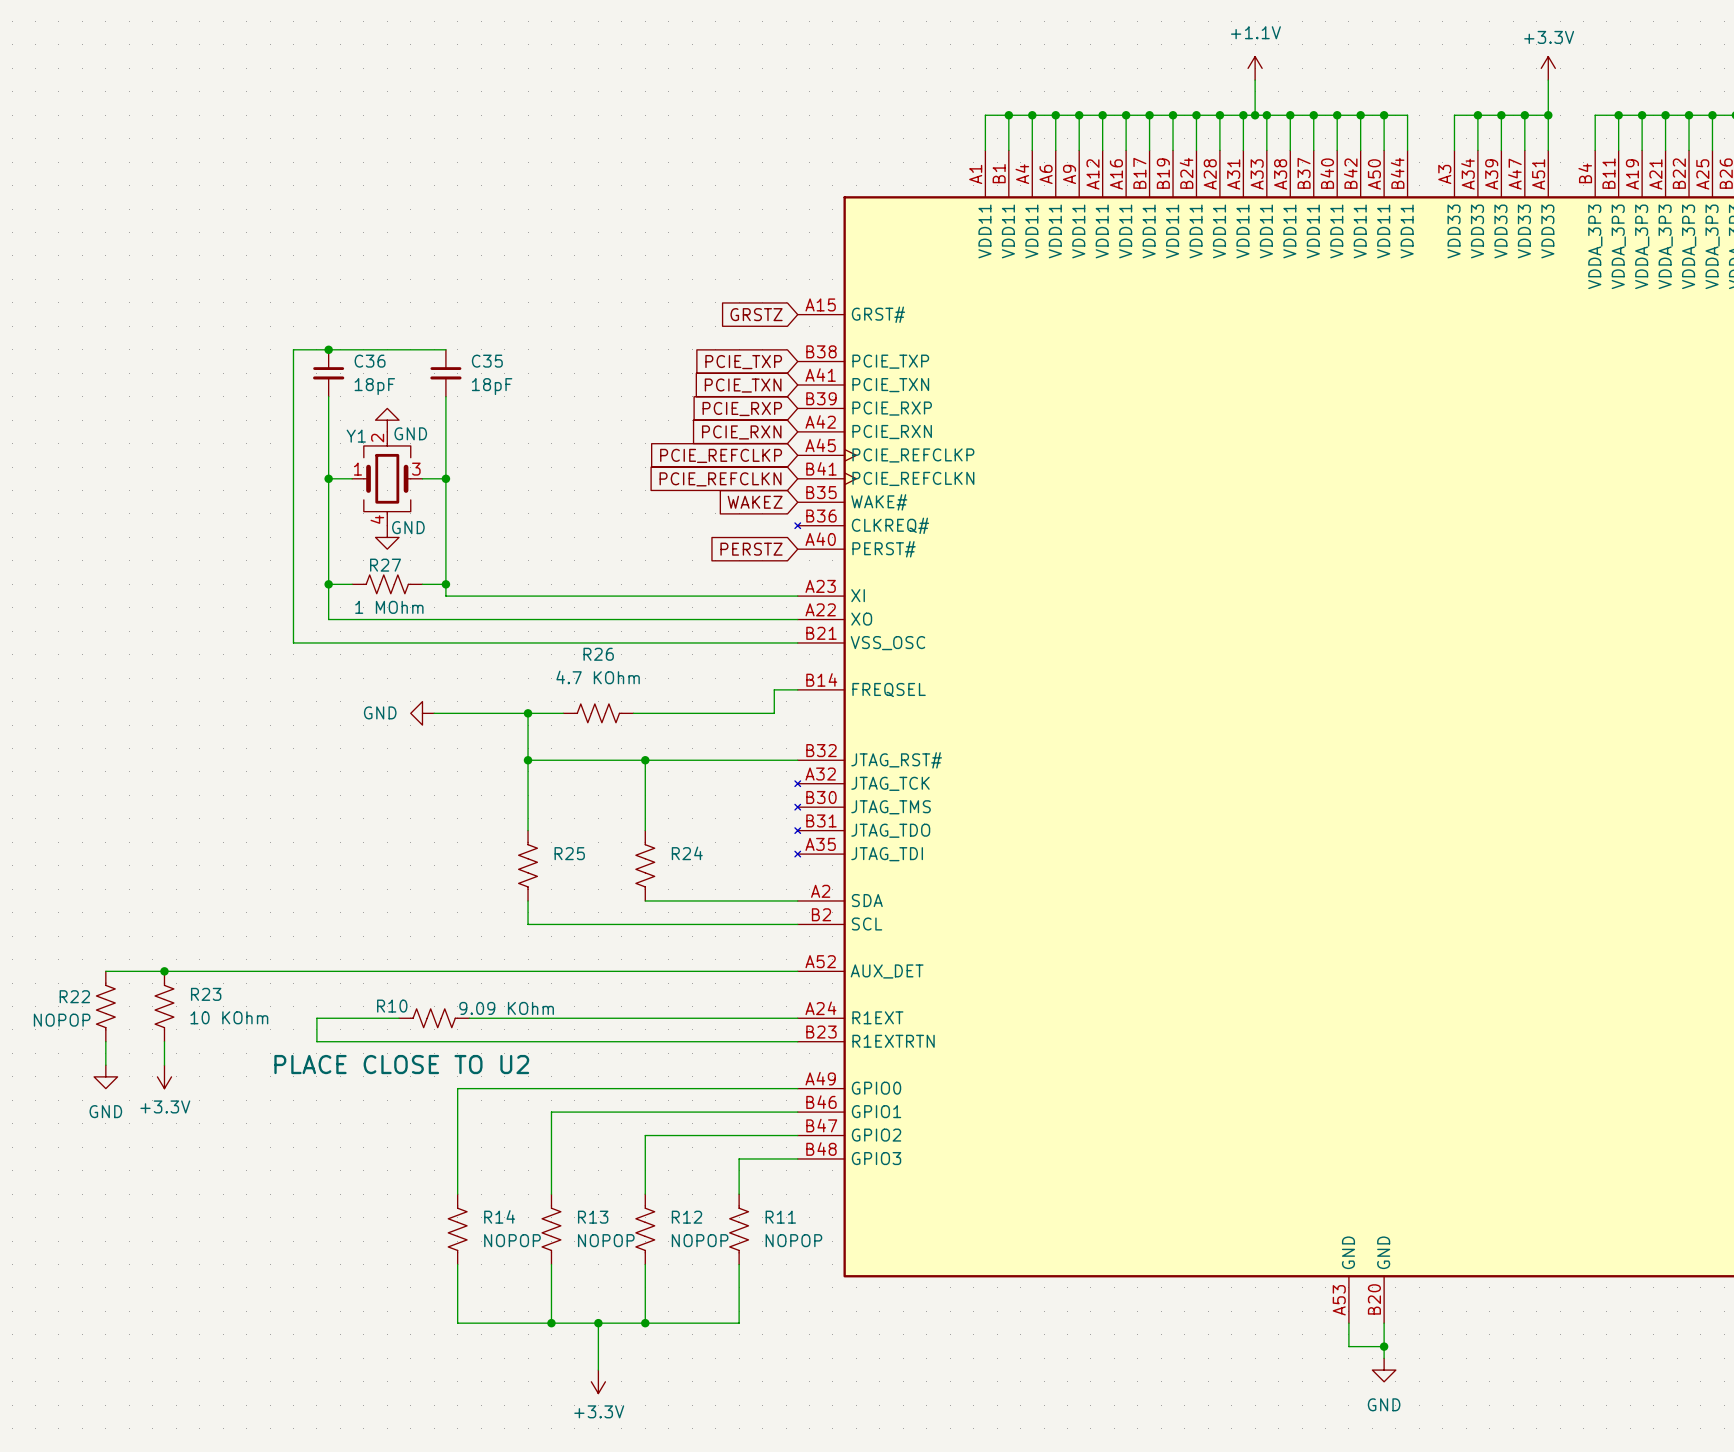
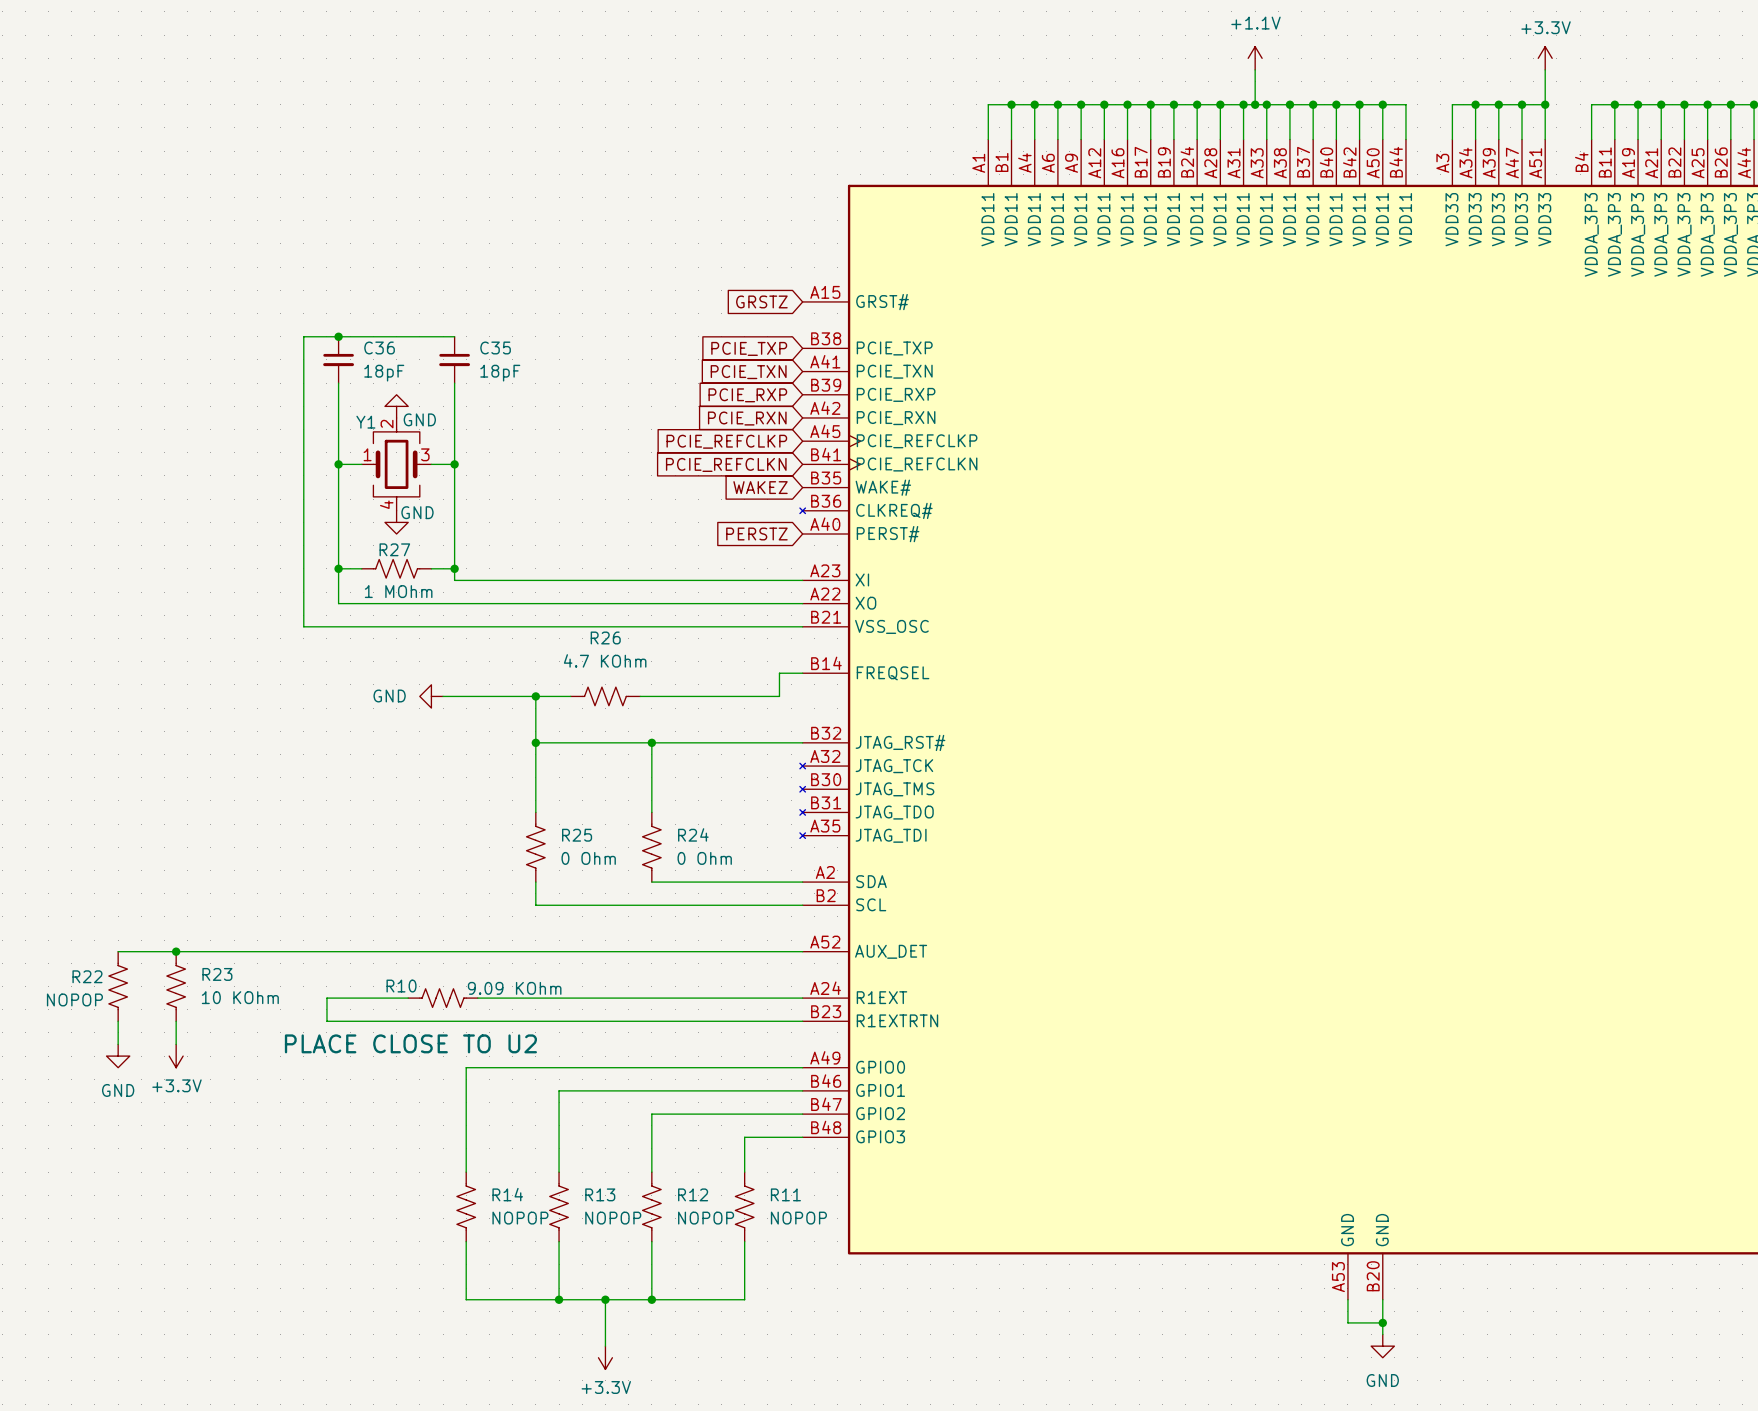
R25 value: none -> 0 Ohm (588, 858)
R24 value: none -> 0 Ohm (704, 858)

